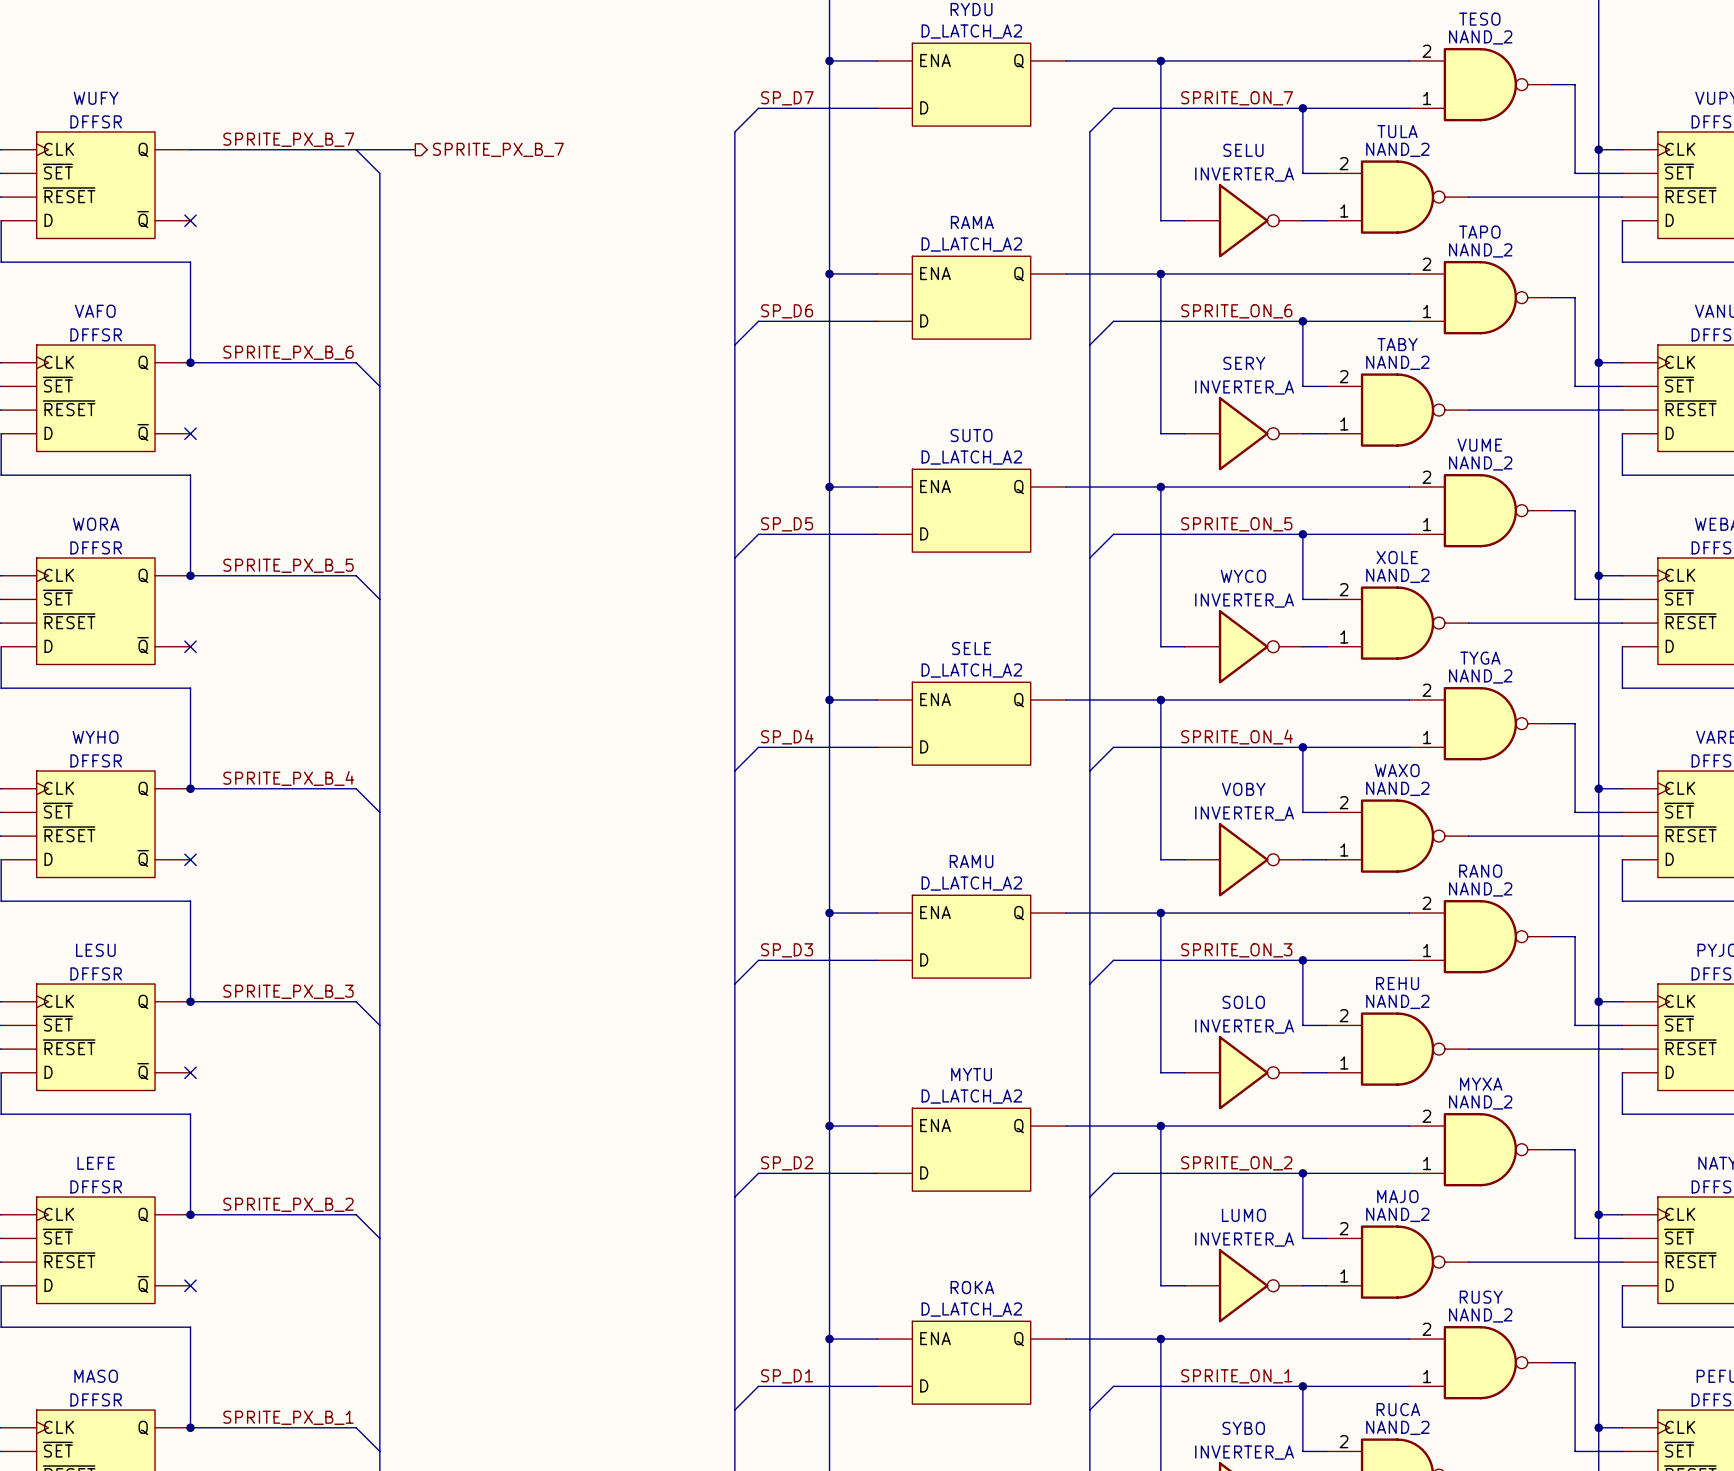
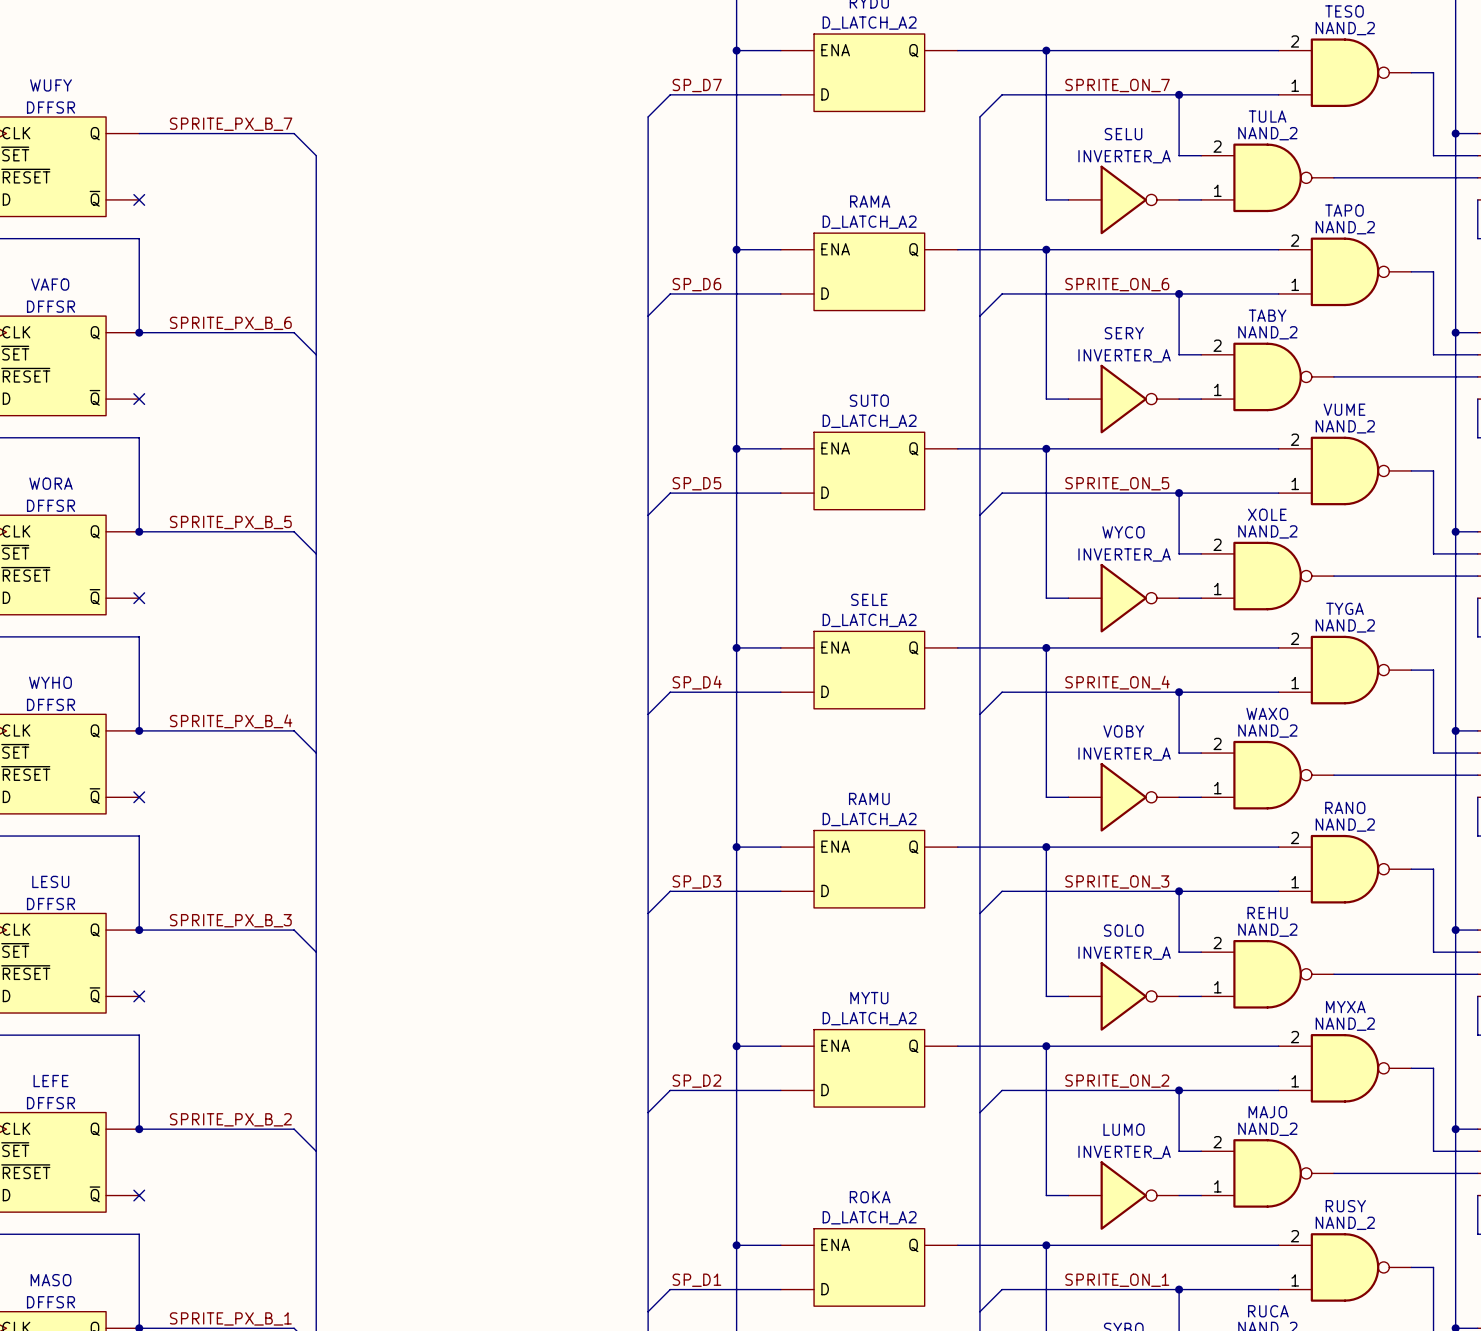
wire: (356, 149) (415, 149) -> none
hierarchical label: SPRITE_PX_B_7 (498, 149) -> none

